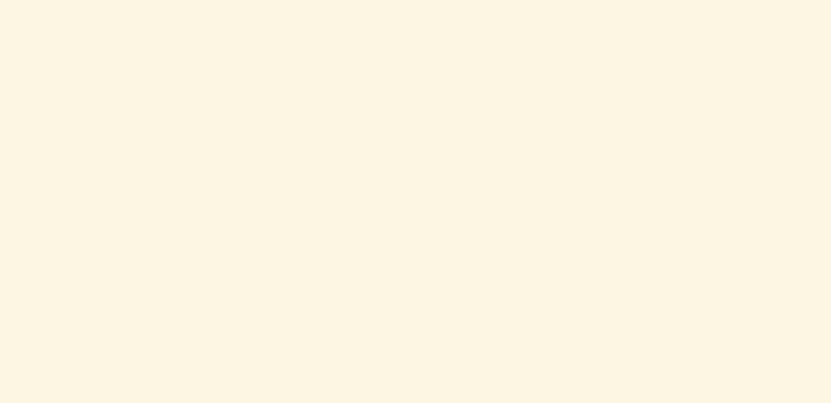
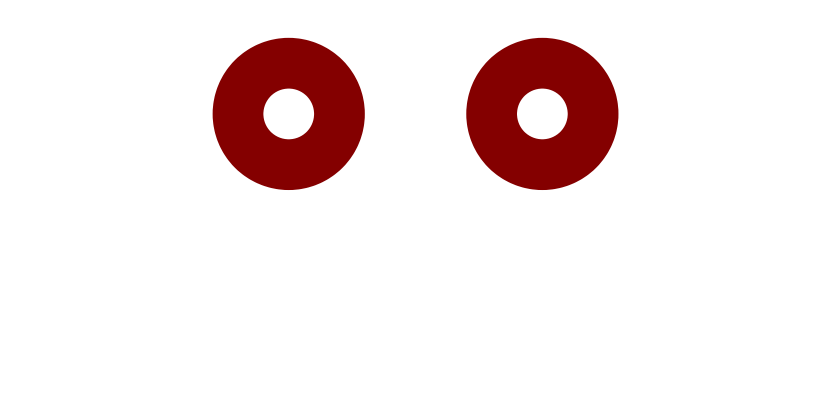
part: none -> (288, 113)
part: none -> (542, 113)

